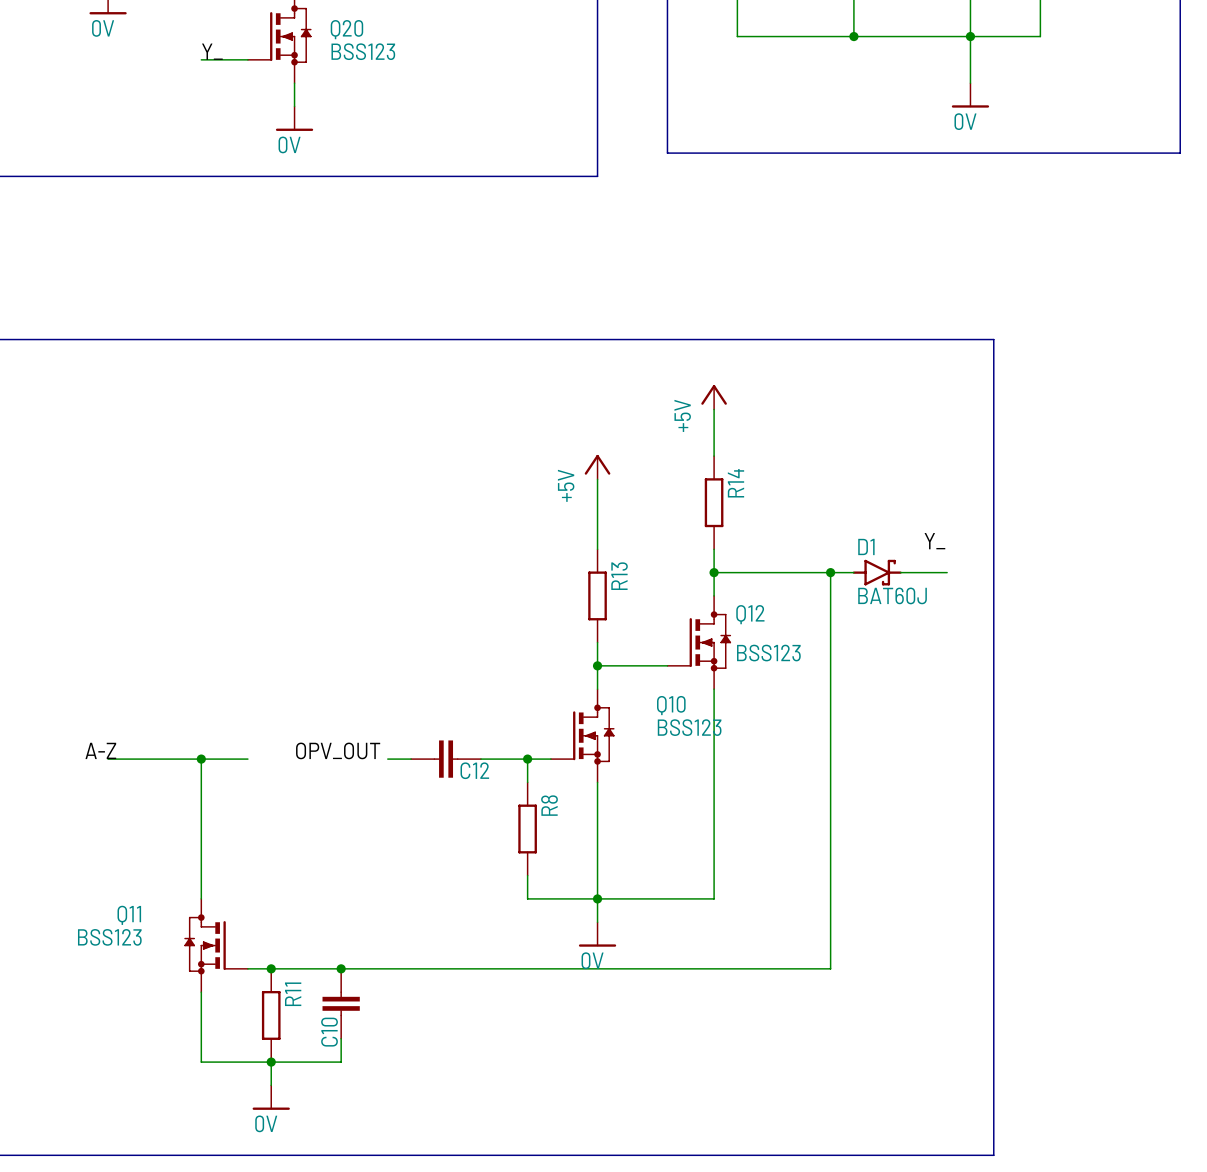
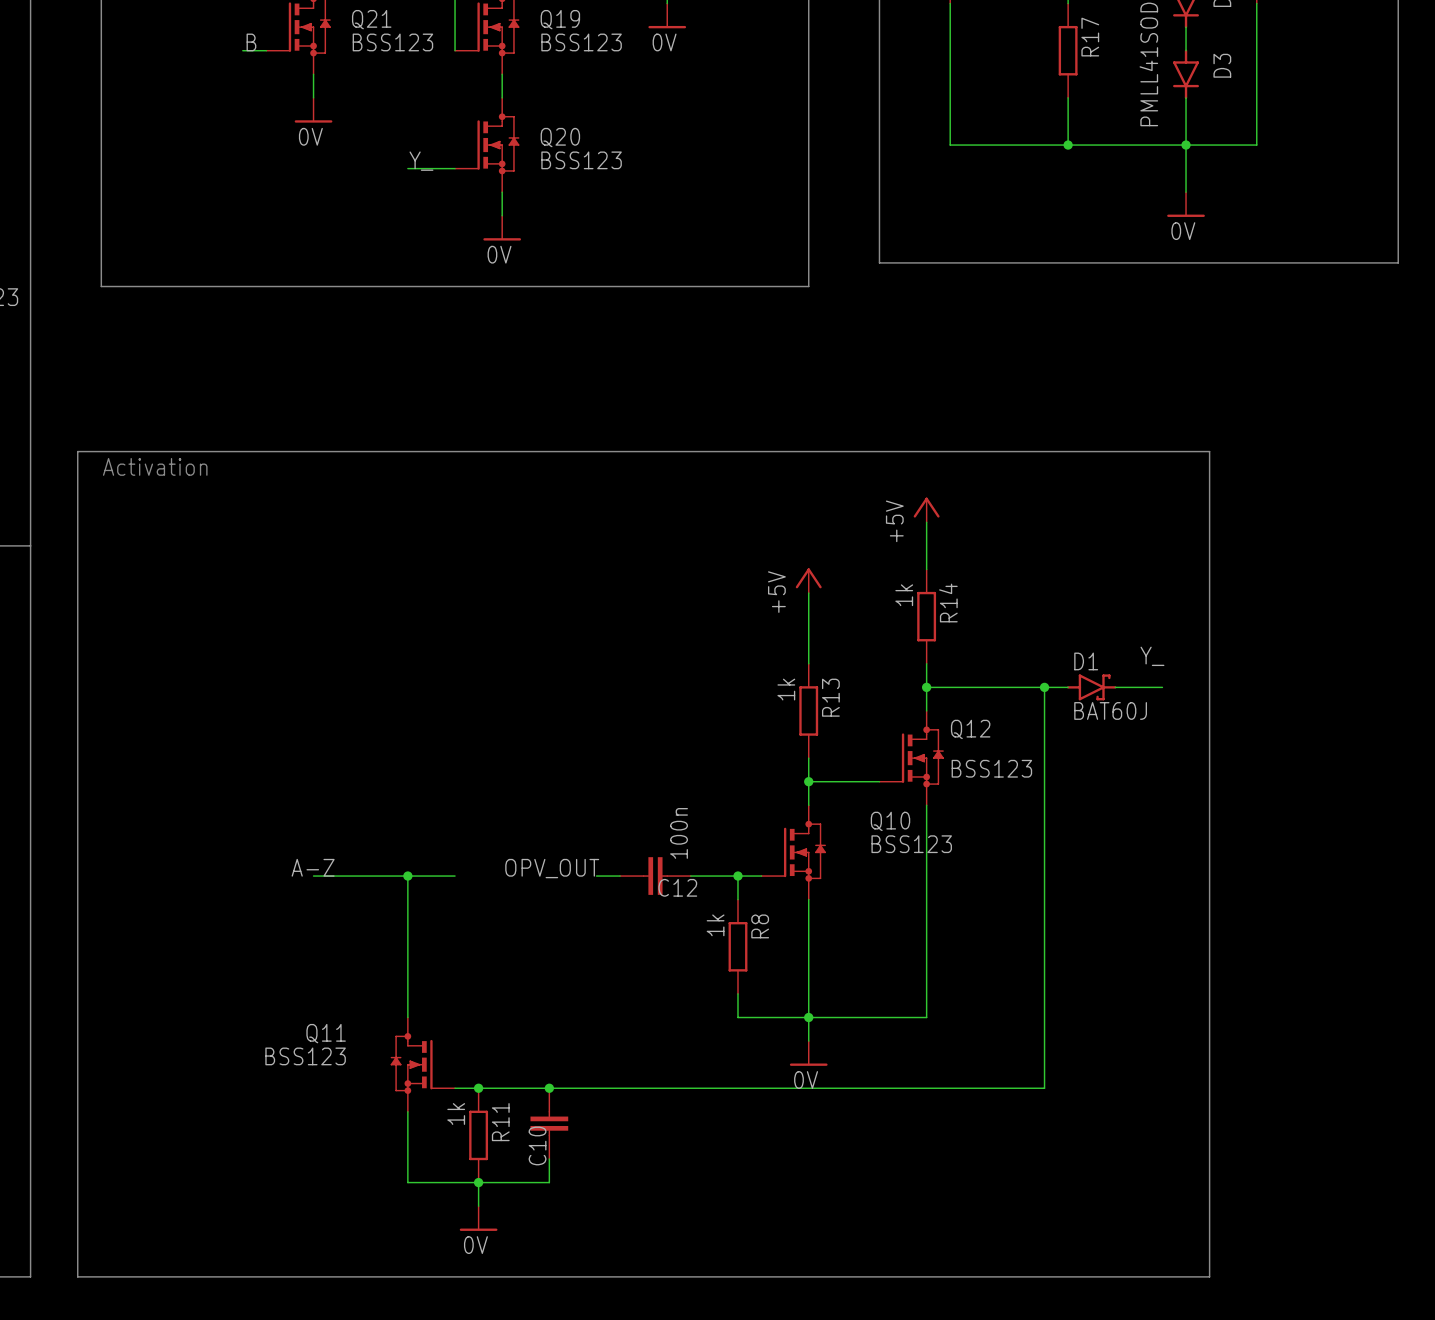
R14 value: none -> 1k (904, 595)
R13 value: none -> 1k (786, 689)
C12 value: none -> 100n (679, 833)
R8 value: none -> 1k (715, 925)
R11 value: none -> 1k (456, 1114)

